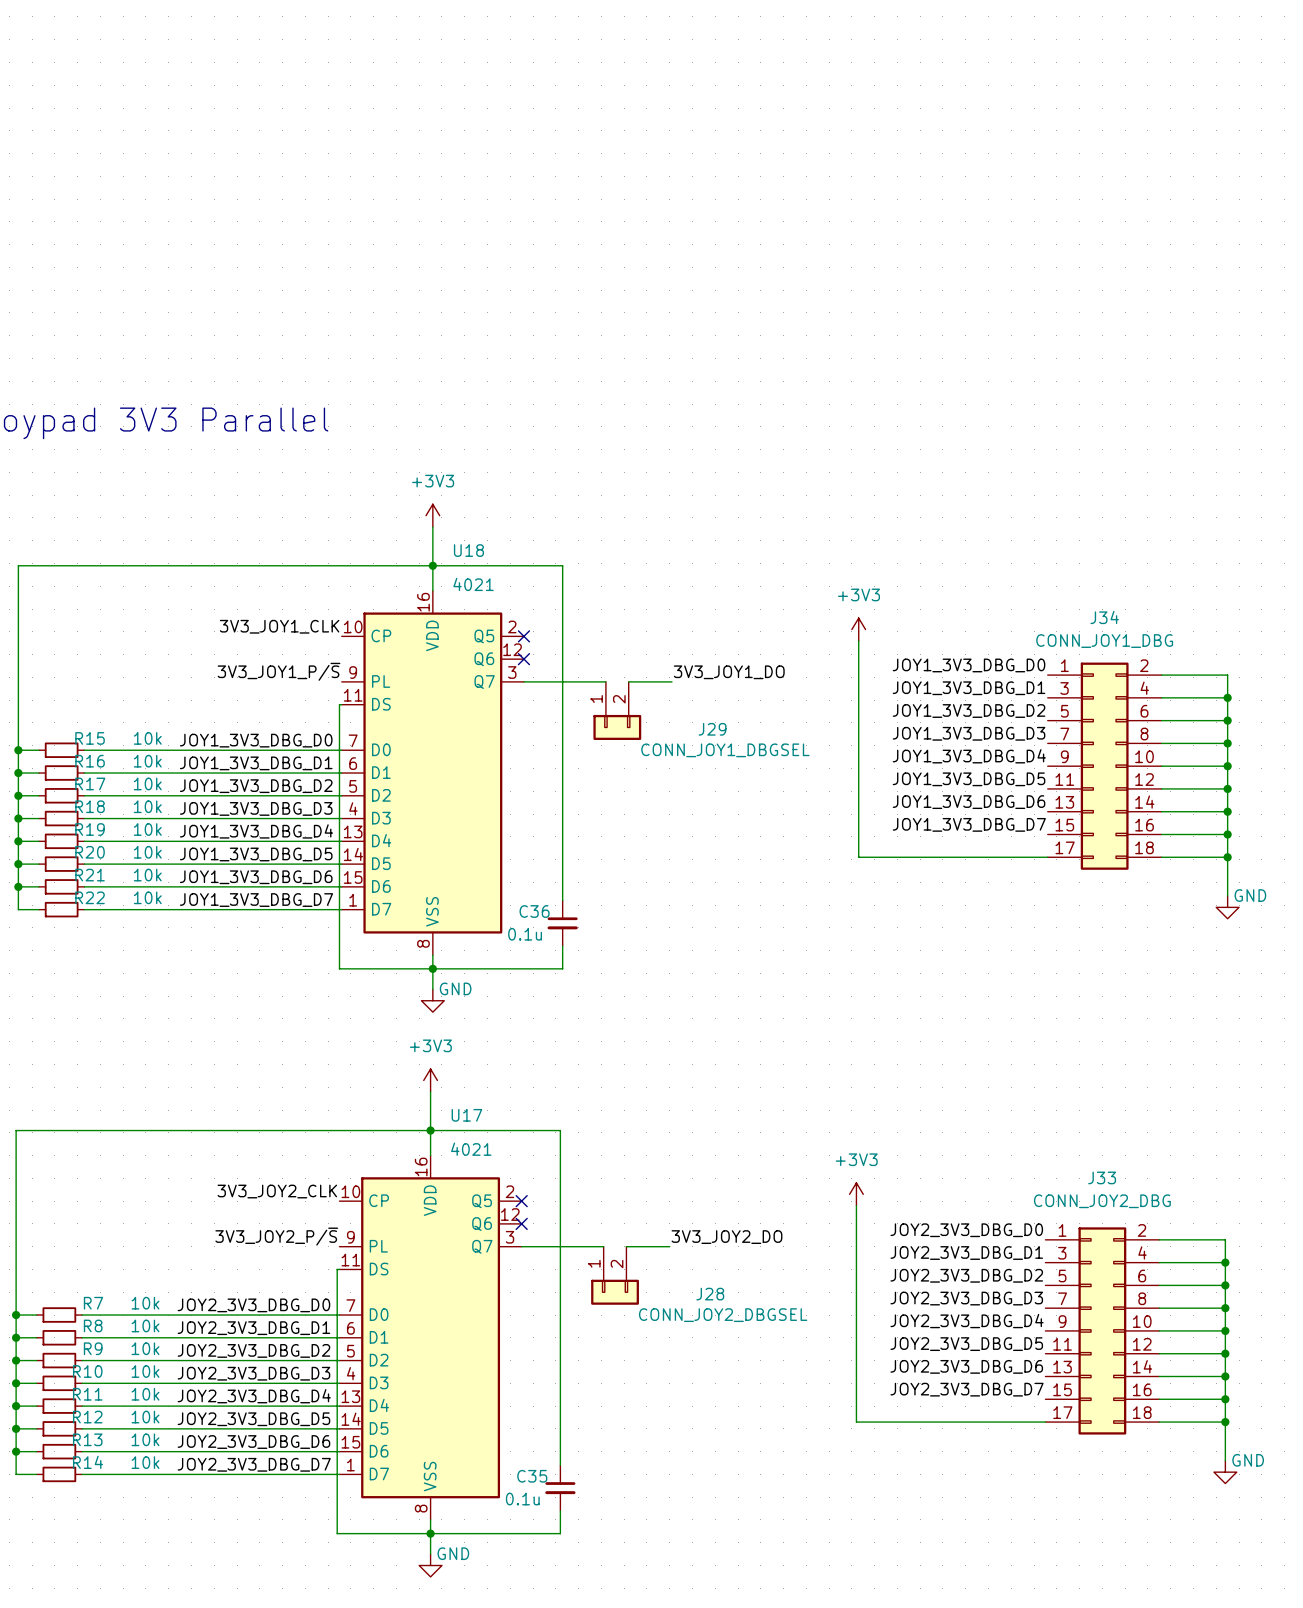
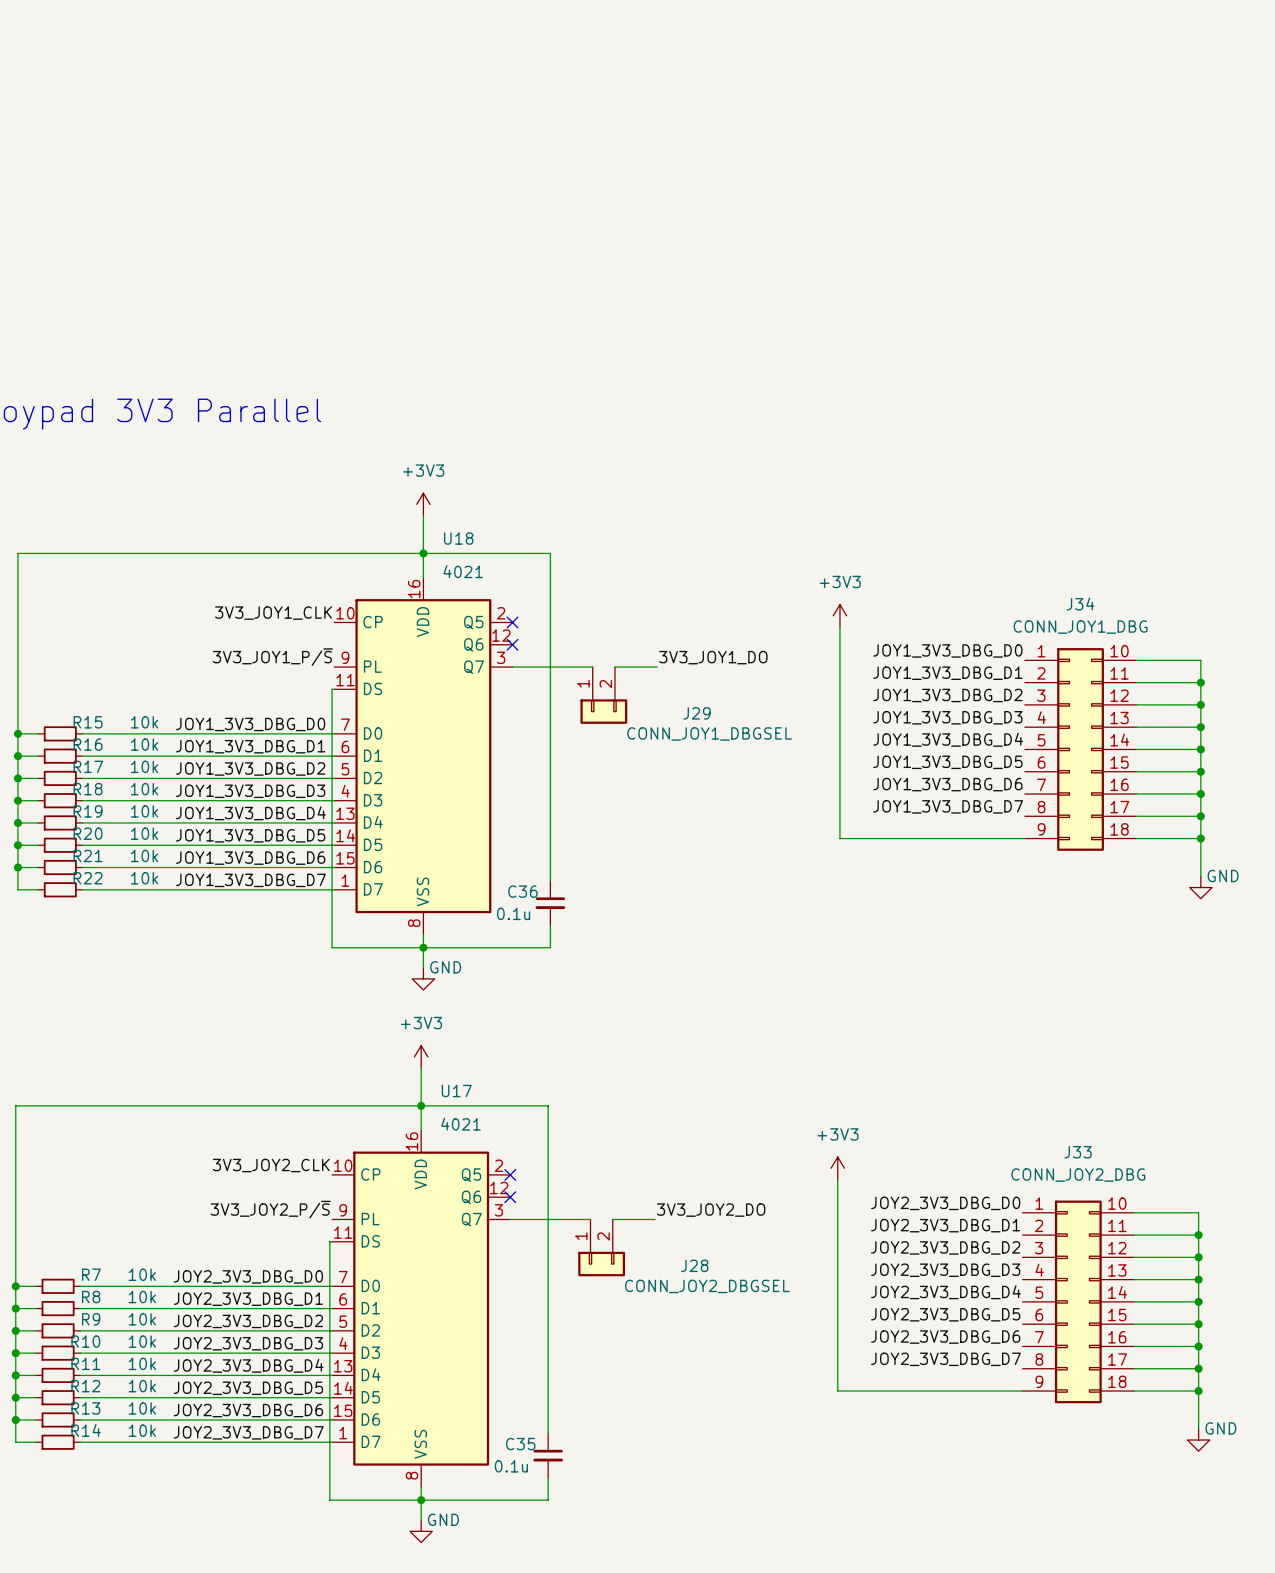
J34 symbol: [1047, 662, 1162, 870] -> [1024, 648, 1137, 851]
J33 symbol: [1045, 1227, 1160, 1435] -> [1022, 1200, 1135, 1404]

